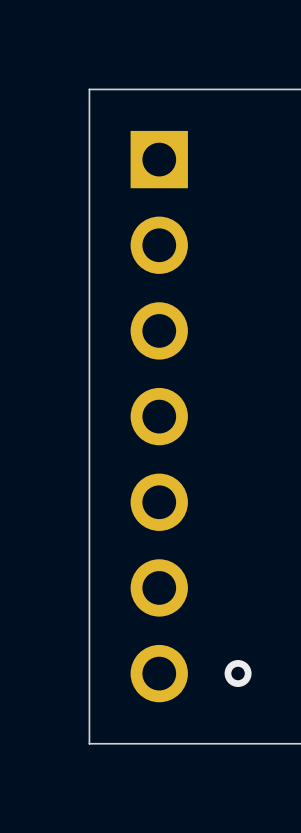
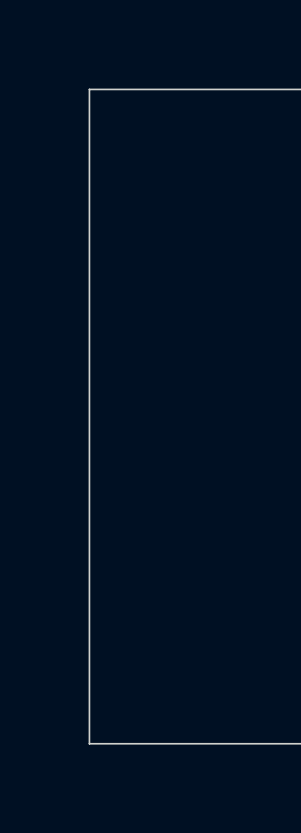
part: (159, 416) -> none
via: (238, 673) -> none

